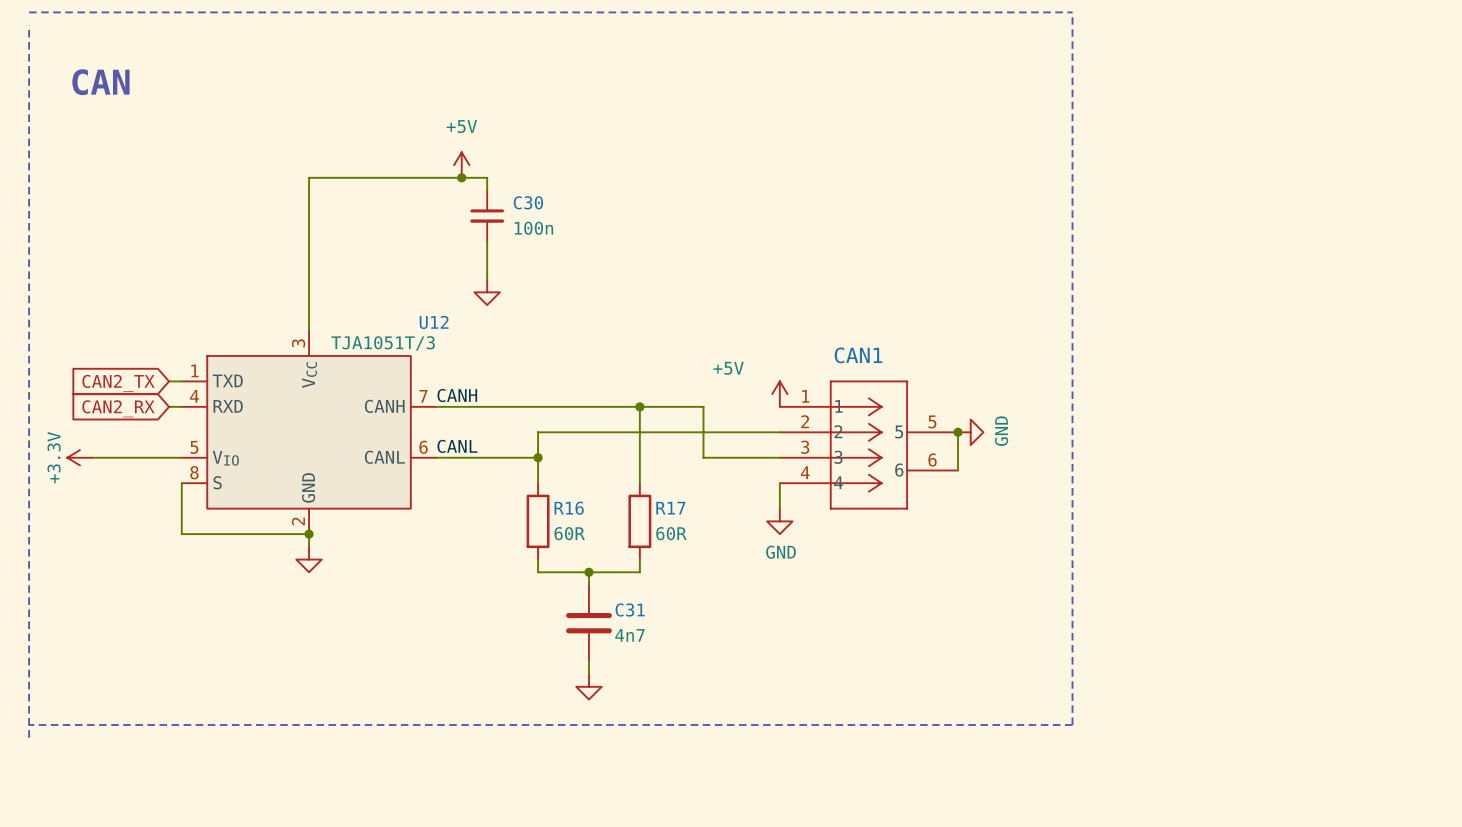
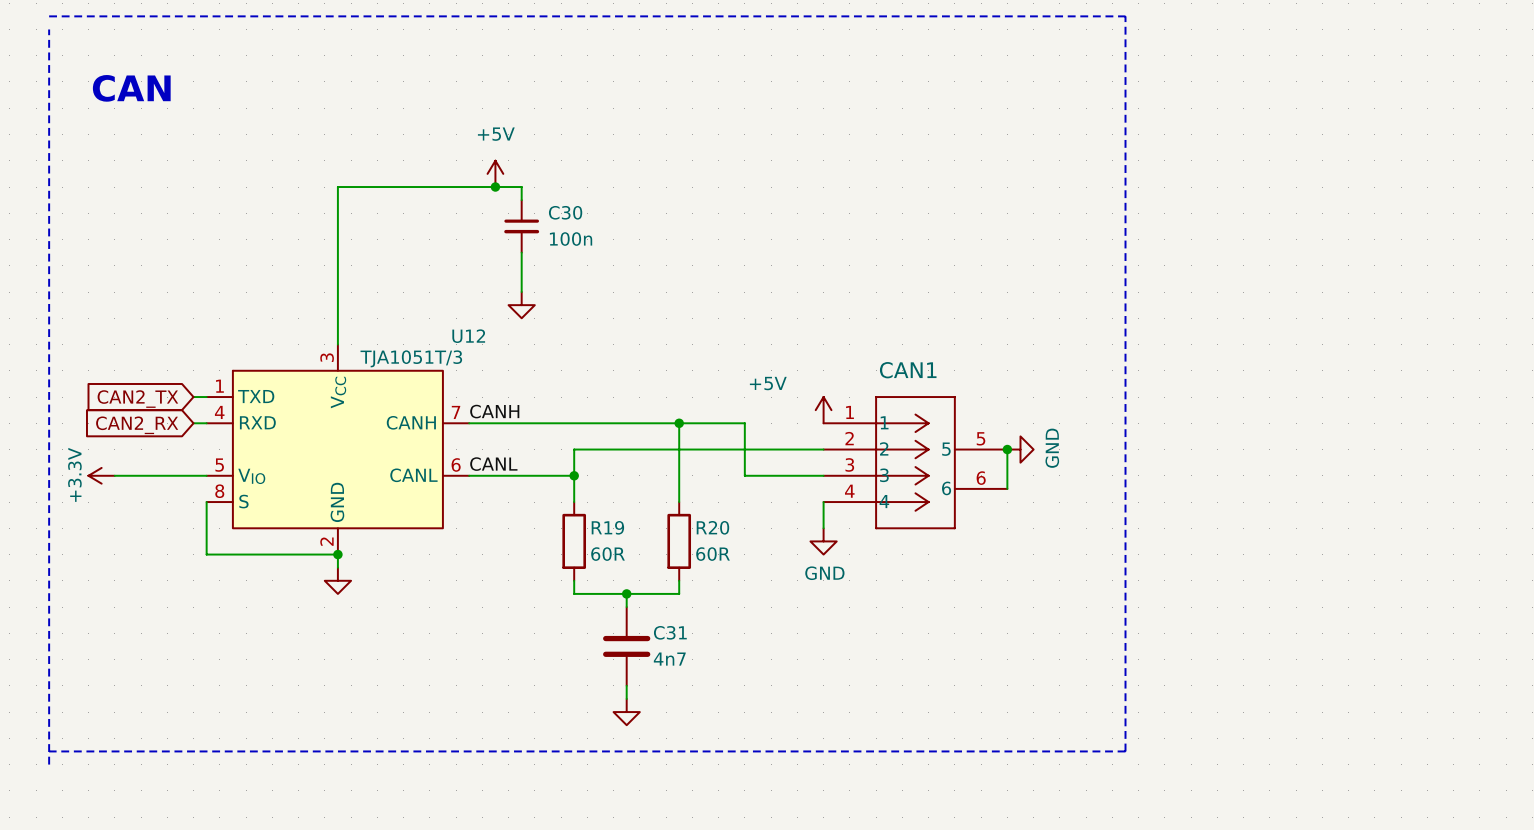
R16 name: R16 (569, 508) -> R19 (607, 527)
R17 name: R17 (670, 508) -> R20 (712, 527)

